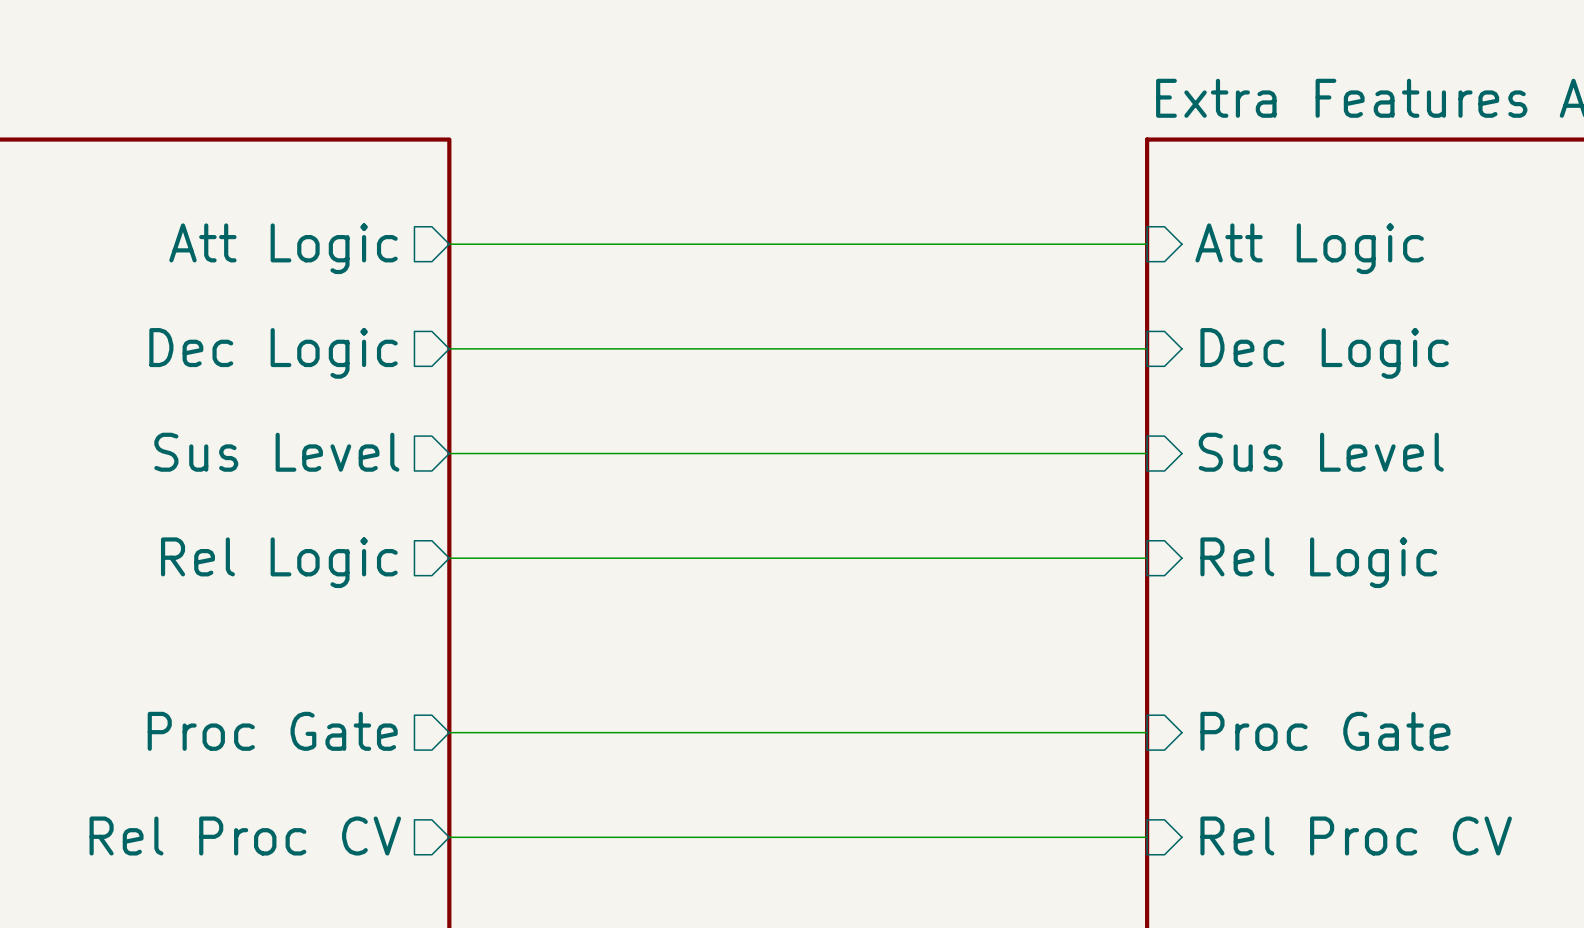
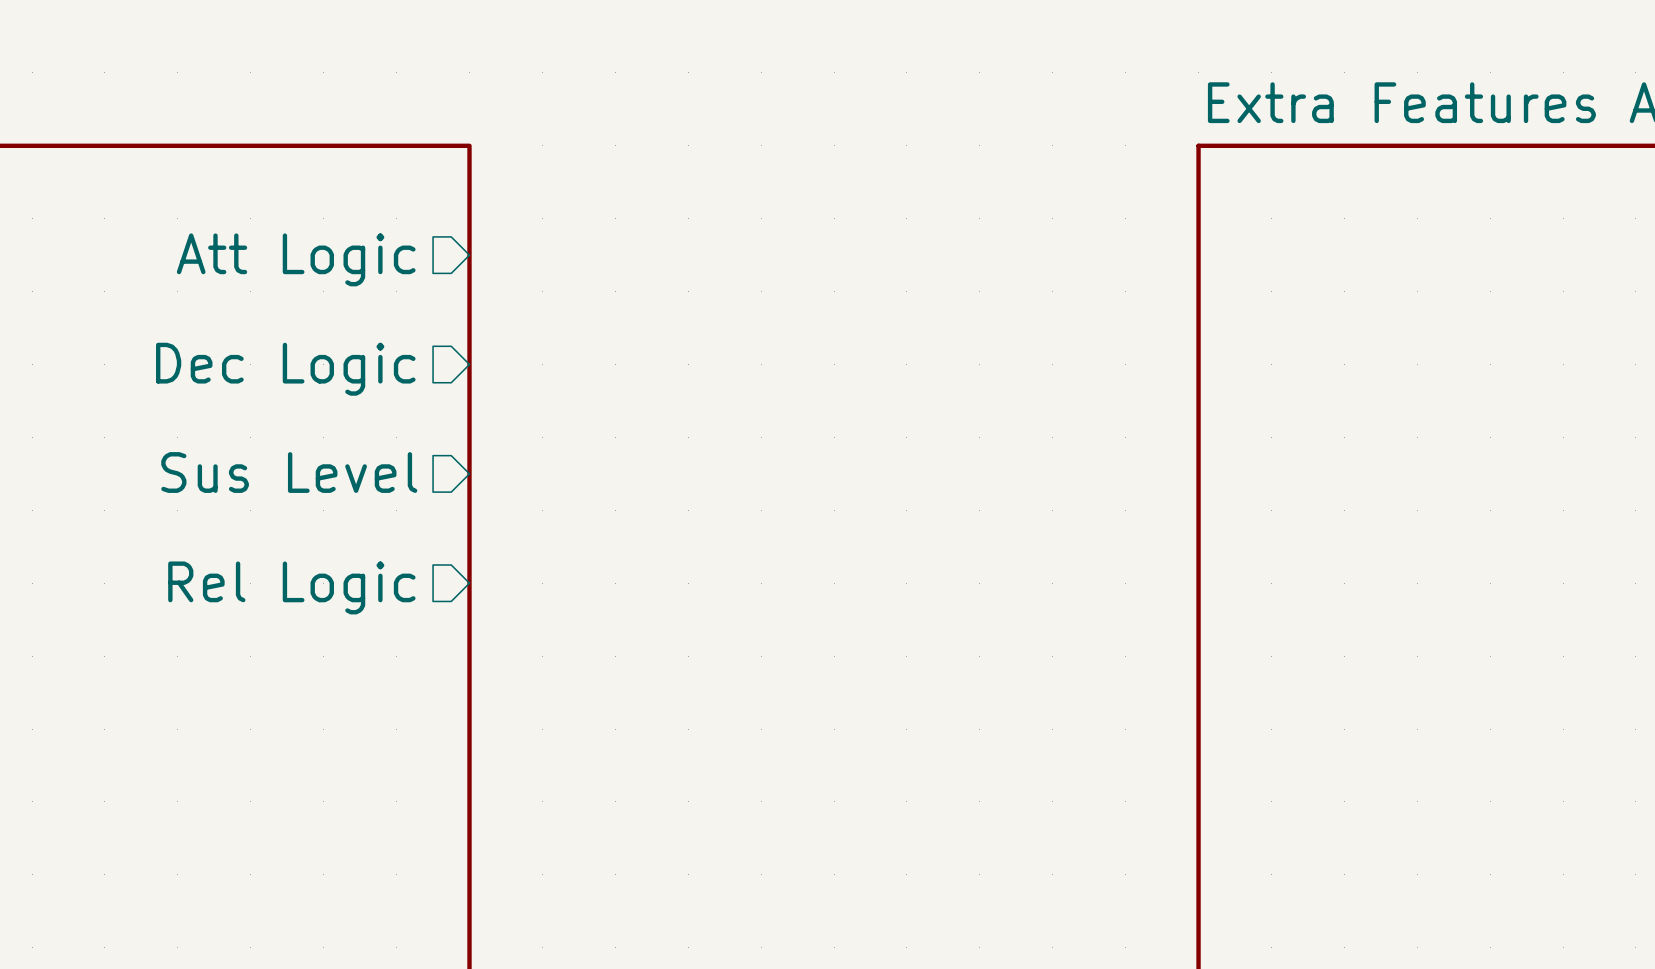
wire: (449, 244) (1147, 244) -> none
sheet pin: Att Logic (1309, 248) -> none
wire: (449, 348) (1147, 348) -> none
sheet pin: Dec Logic (1324, 353) -> none
sheet pin: Sus Level (1321, 452) -> none
wire: (449, 453) (1147, 453) -> none
wire: (449, 558) (1147, 558) -> none
sheet pin: Rel Logic (1318, 562) -> none
sheet pin: Proc Gate (272, 731) -> none
sheet pin: Proc Gate (1325, 731) -> none
wire: (449, 732) (1147, 732) -> none
sheet pin: Rel Proc CV (245, 836) -> none
sheet pin: Rel Proc CV (1356, 836) -> none
wire: (449, 837) (1147, 837) -> none

